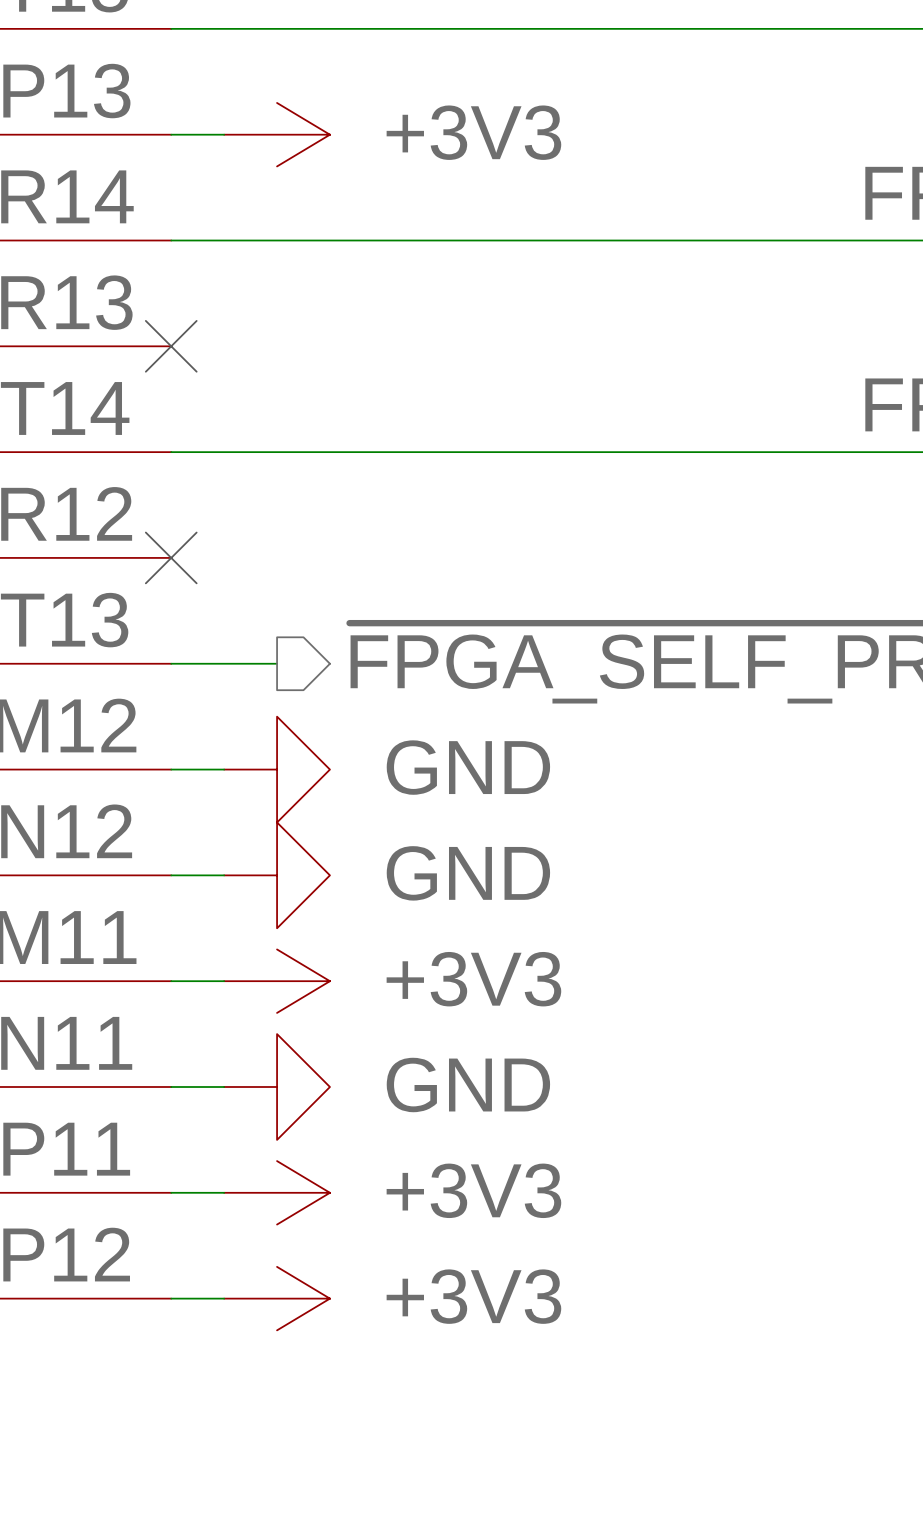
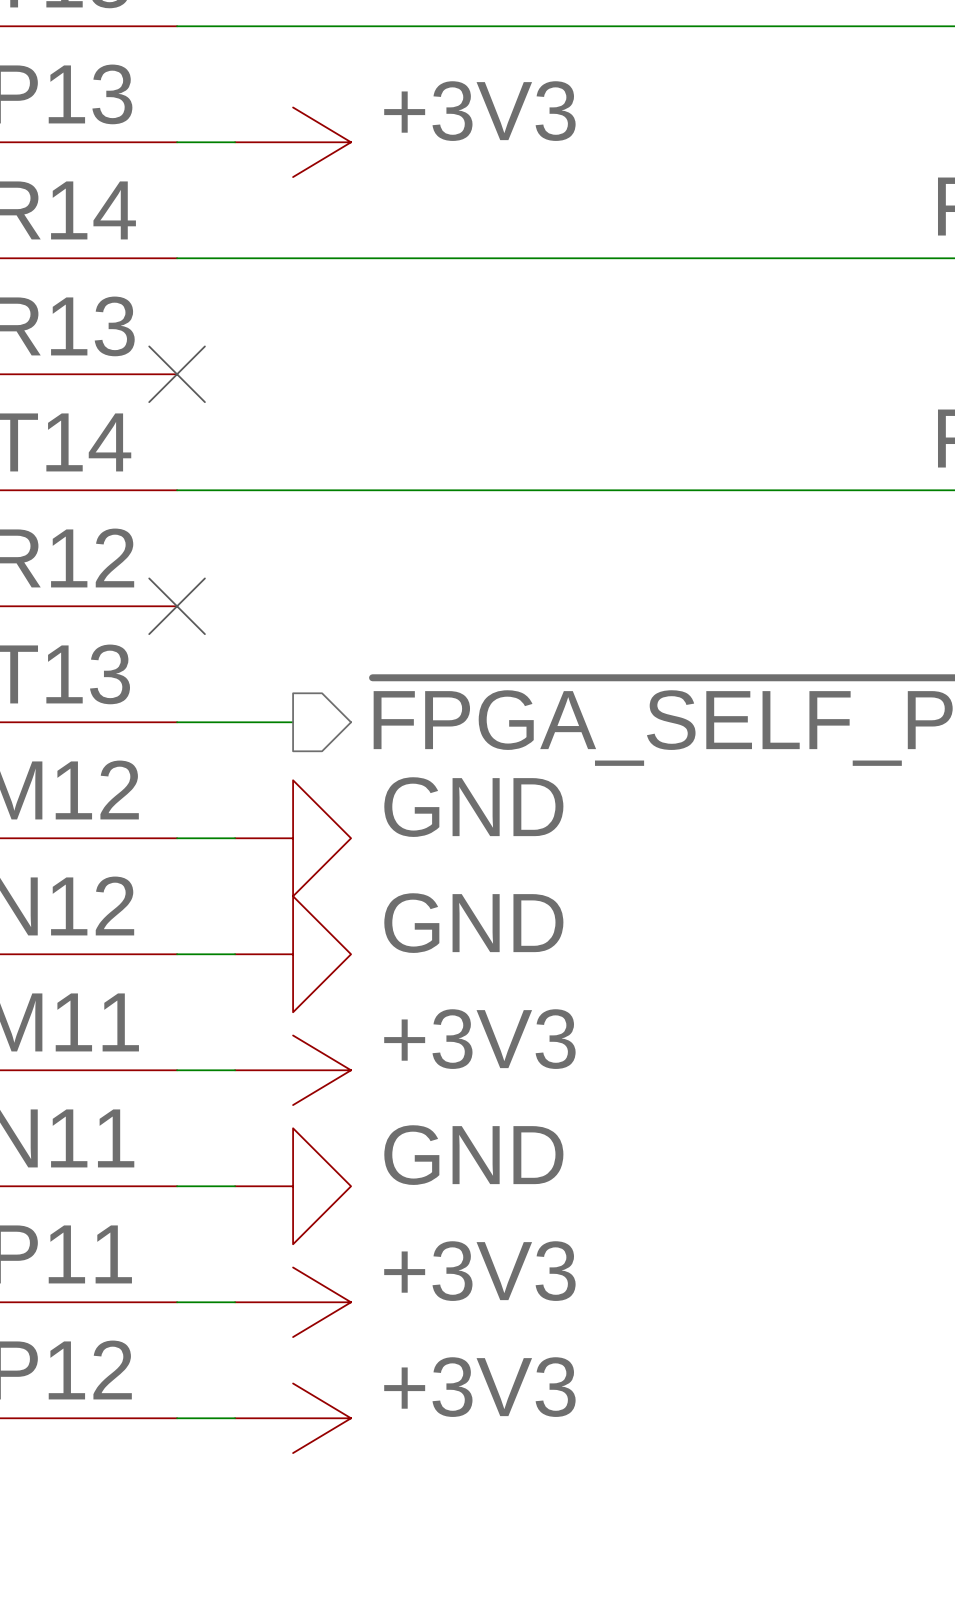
power symbol text position: +3V3 (473, 132) -> +3V3 (479, 111)
power symbol text position: GND (468, 767) -> GND (473, 807)
power symbol text position: GND (468, 873) -> GND (473, 923)
power symbol text position: +3V3 (473, 979) -> +3V3 (479, 1039)
power symbol text position: GND (468, 1085) -> GND (473, 1155)
power symbol text position: +3V3 (473, 1190) -> +3V3 (479, 1271)
power symbol text position: +3V3 (473, 1296) -> +3V3 (479, 1387)

